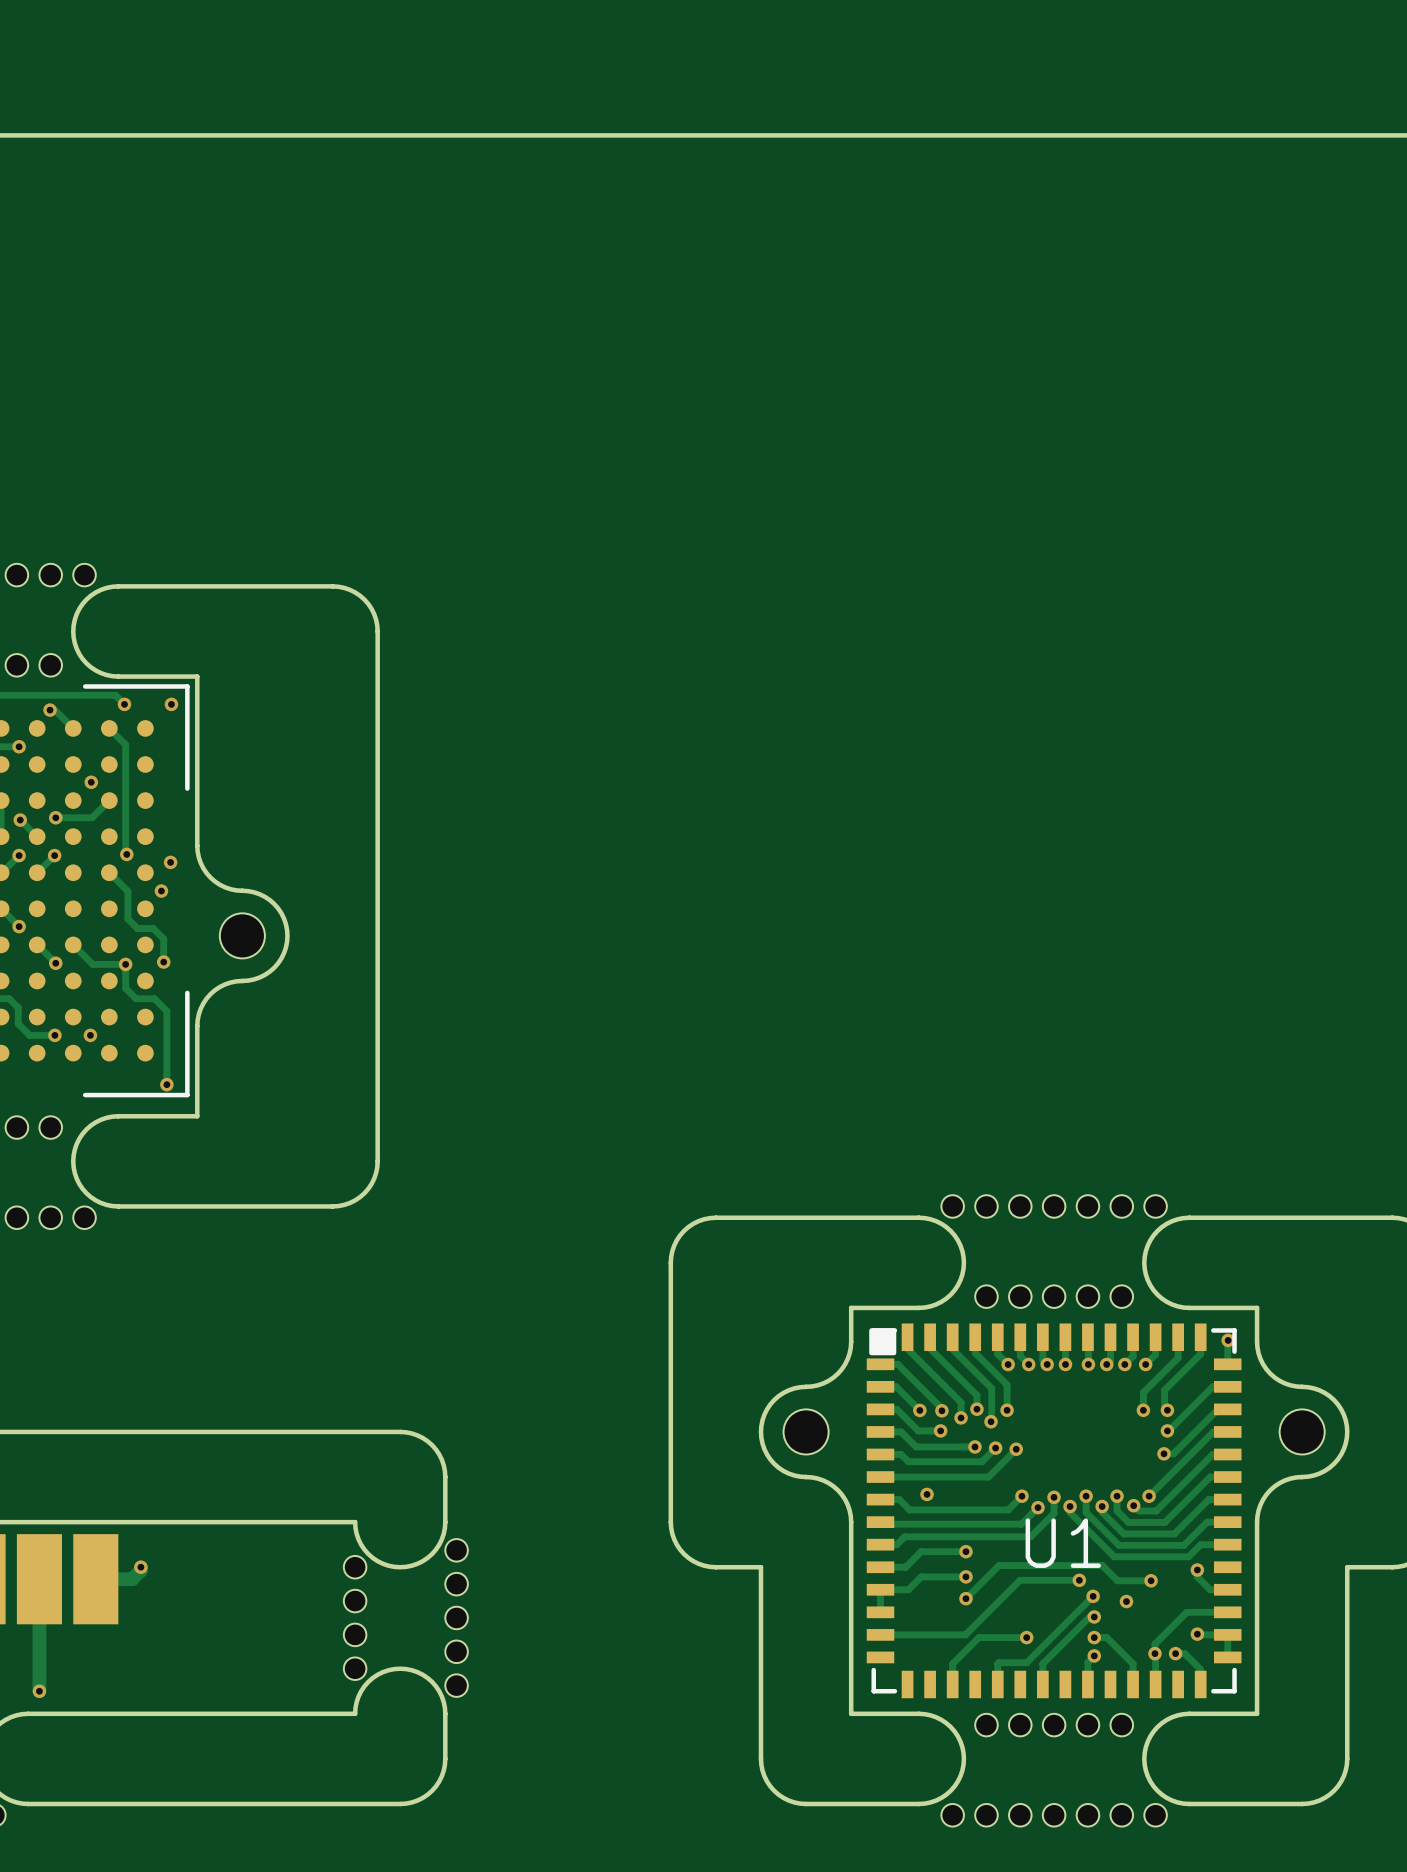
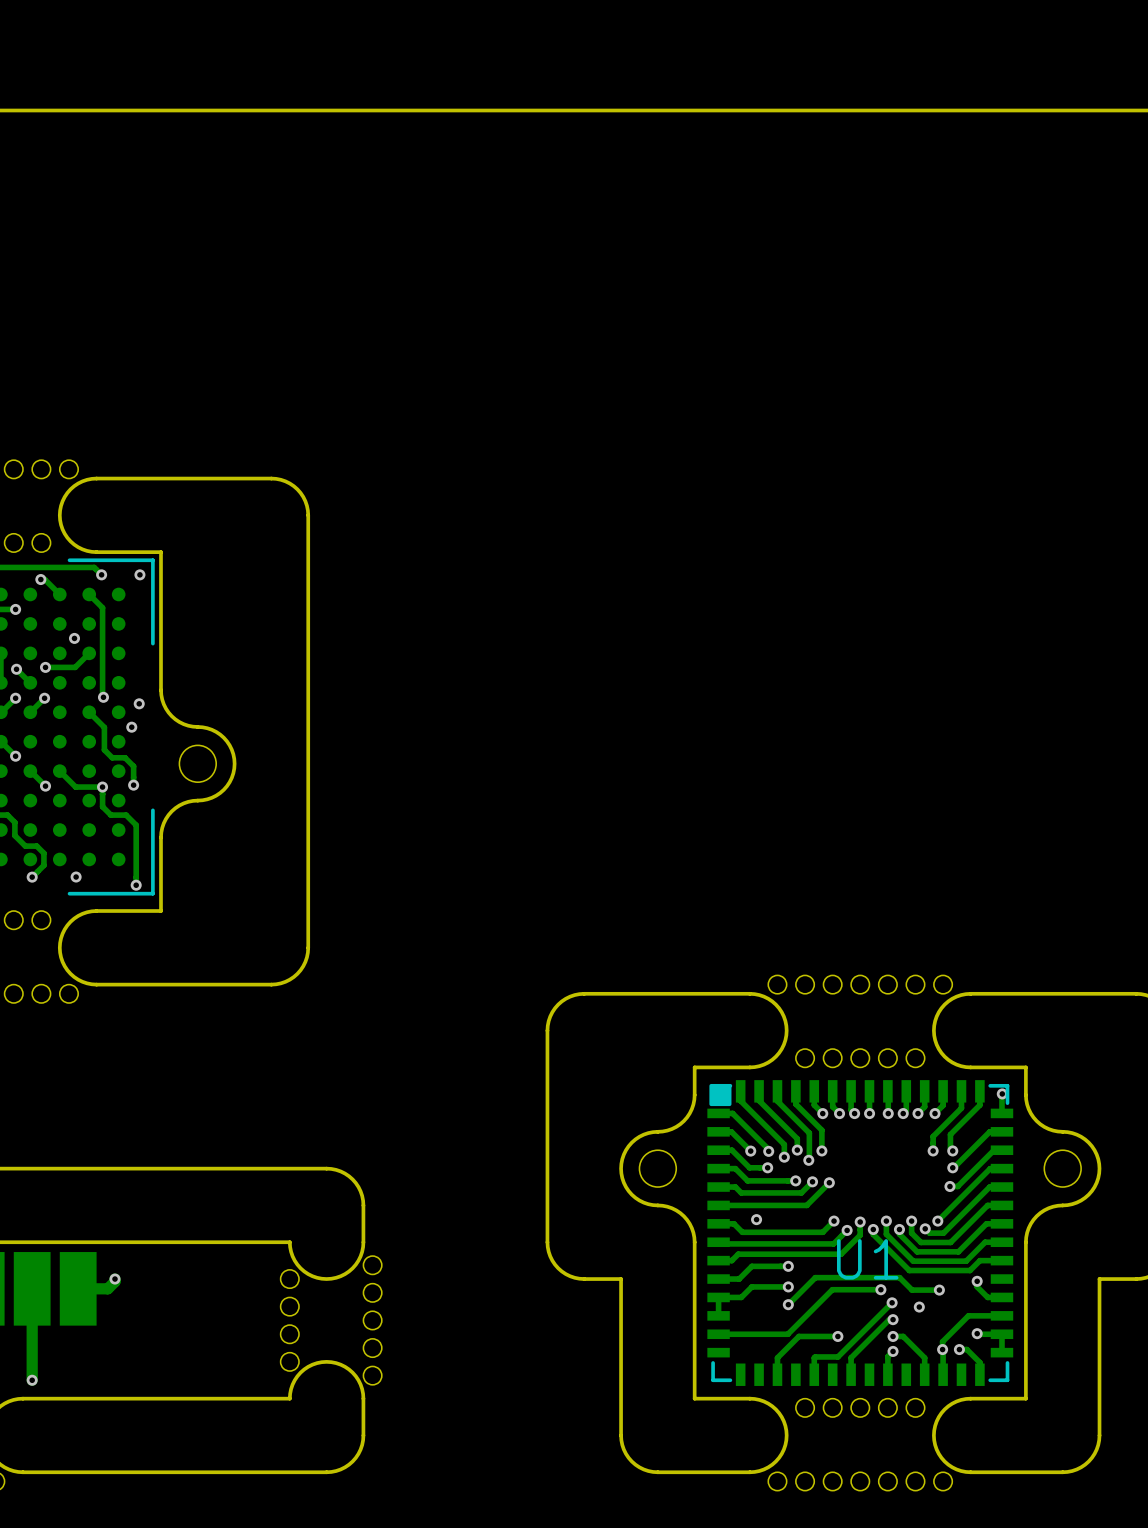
track: (54, 1035) (29, 1035) -> (32, 877) (43, 865) (43, 853) (36, 846) (24, 844)
via: (54, 1035) -> none
via: (90, 1035) -> none
via: none -> (32, 877)
via: none -> (76, 877)

